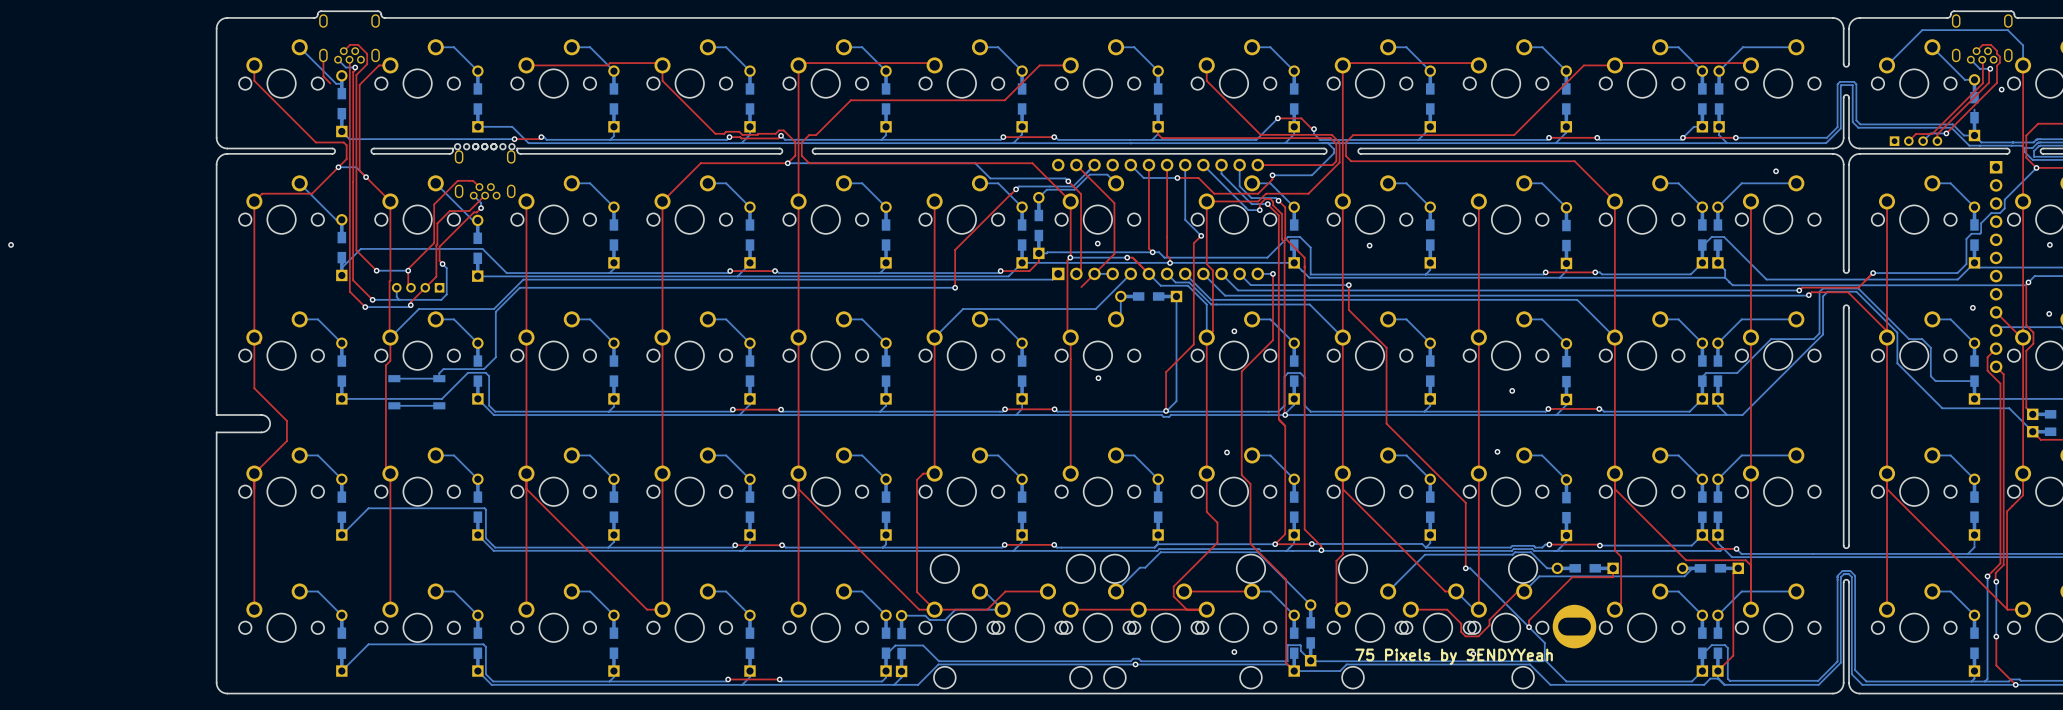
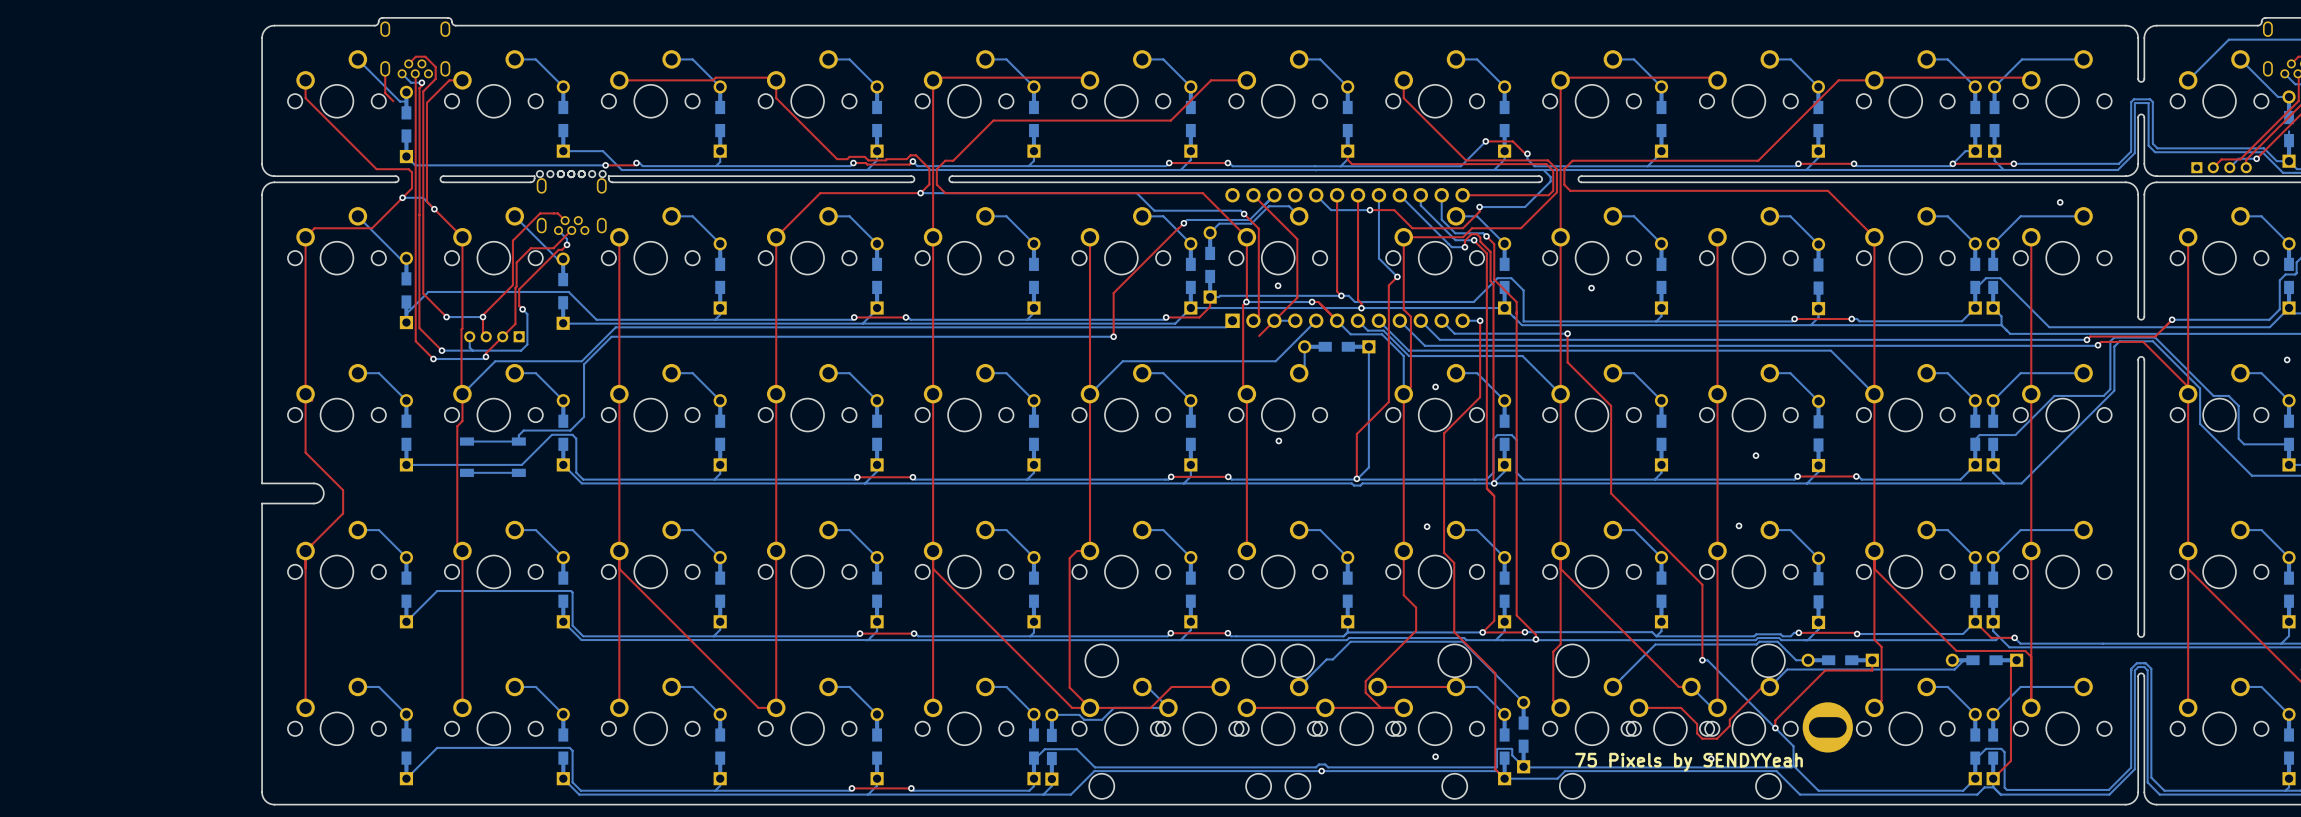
via: (11, 244) -> none

